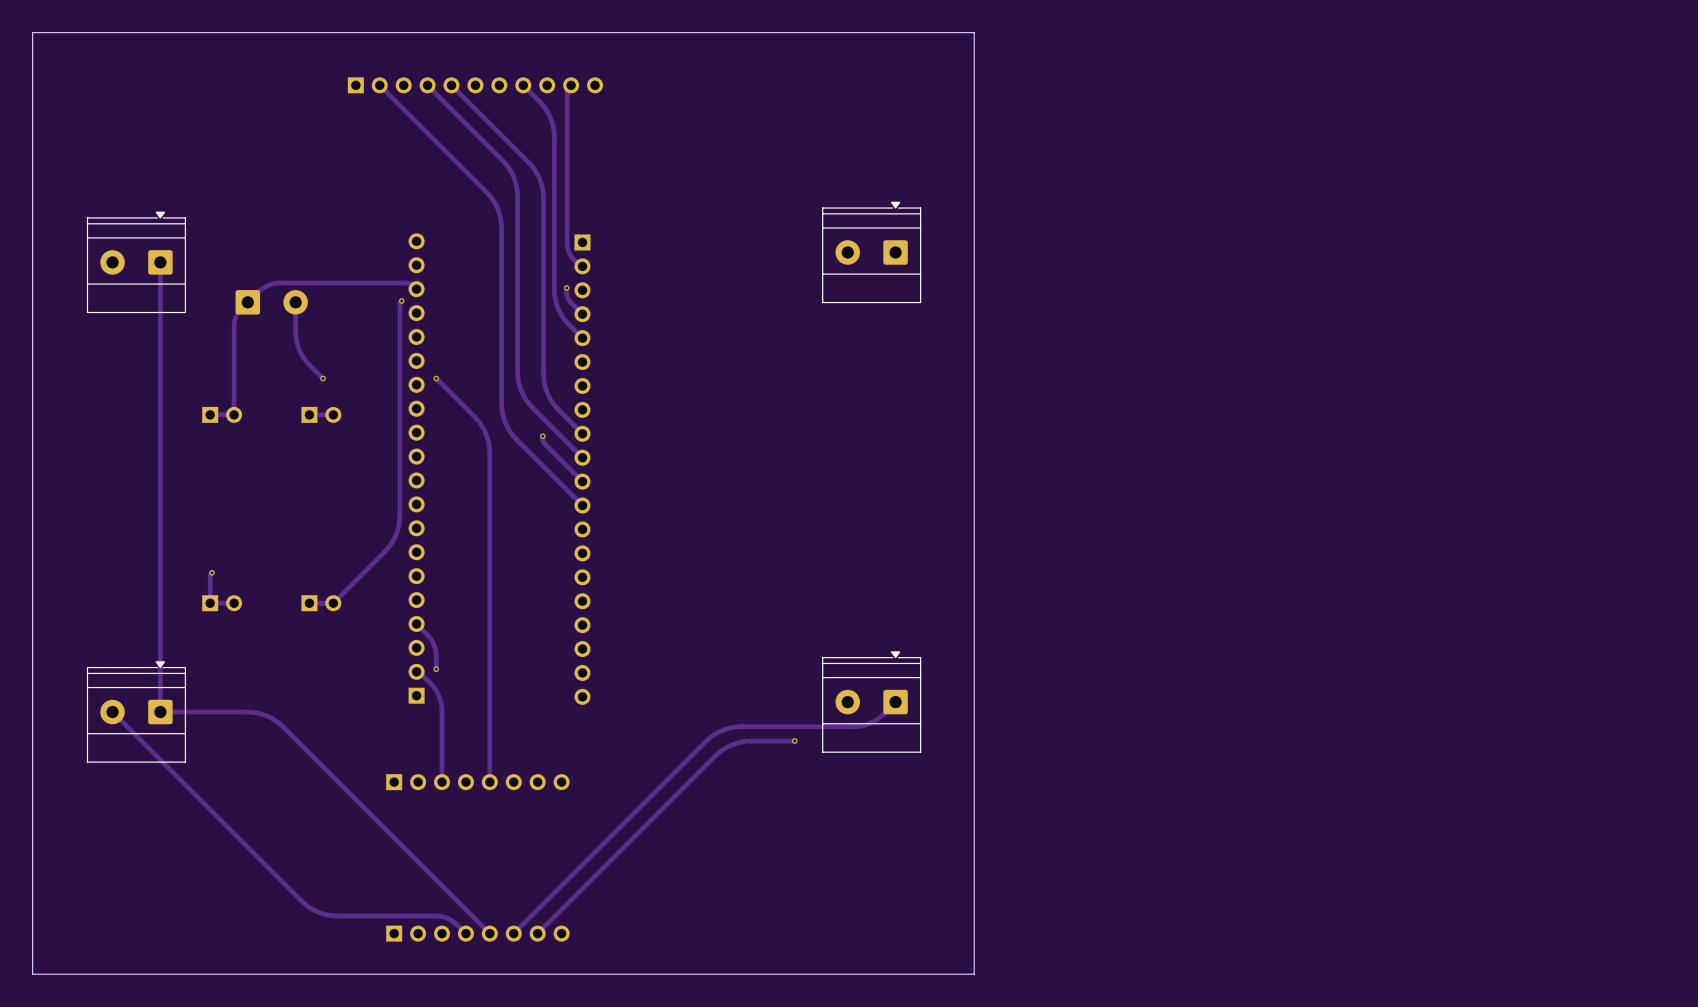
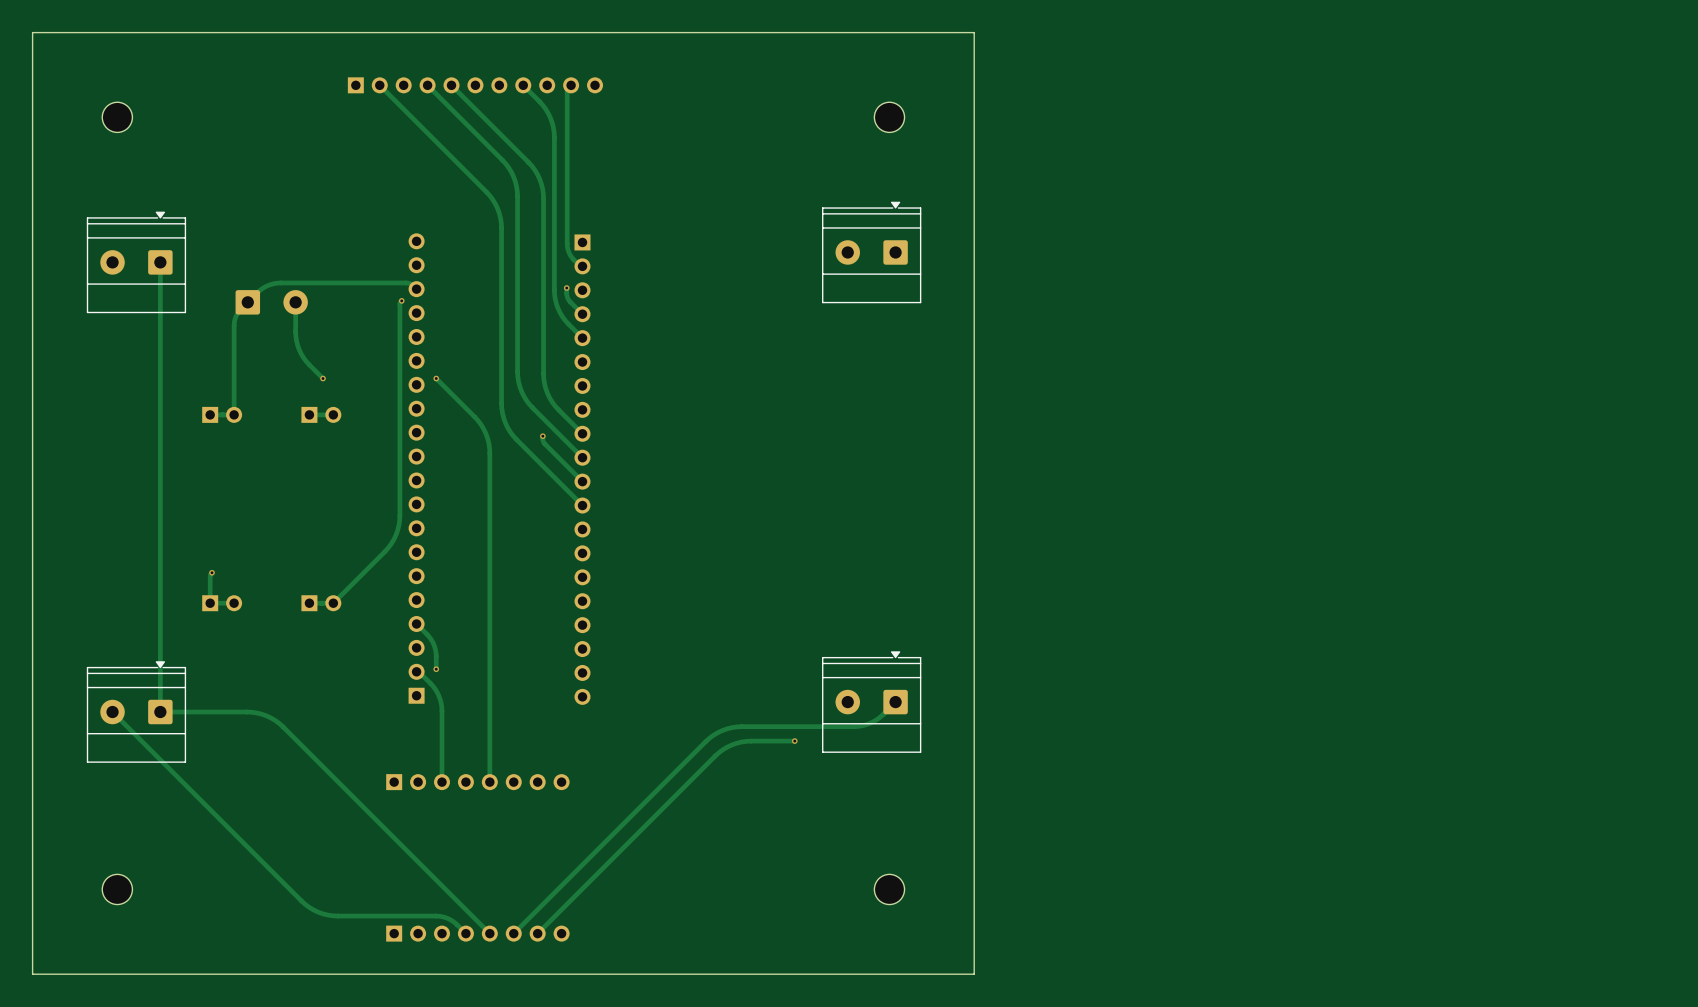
part: none -> (117, 117)
part: none -> (889, 117)
part: none -> (117, 889)
part: none -> (889, 889)

